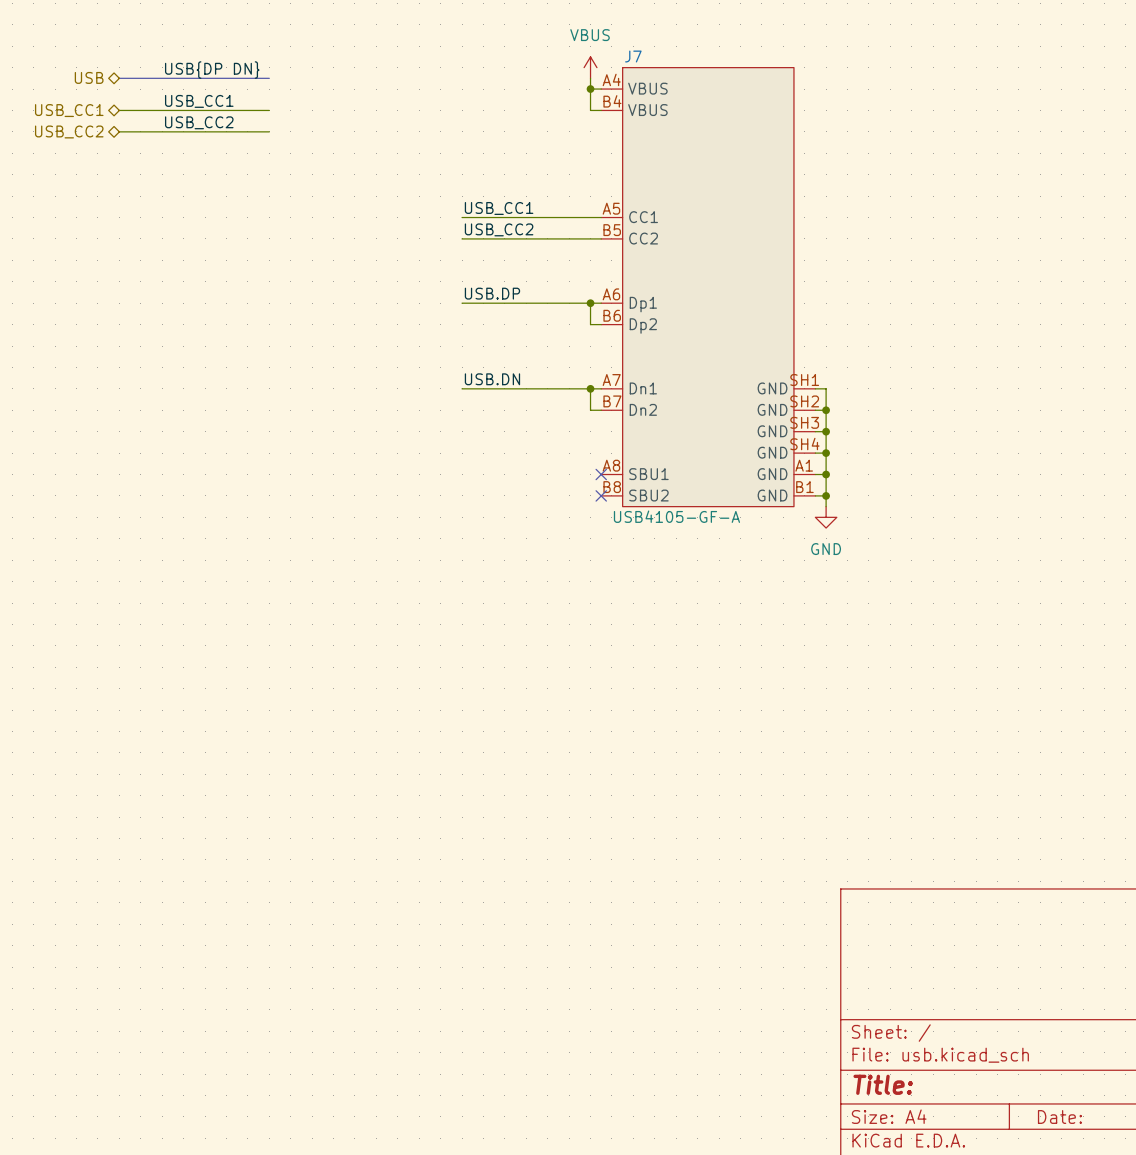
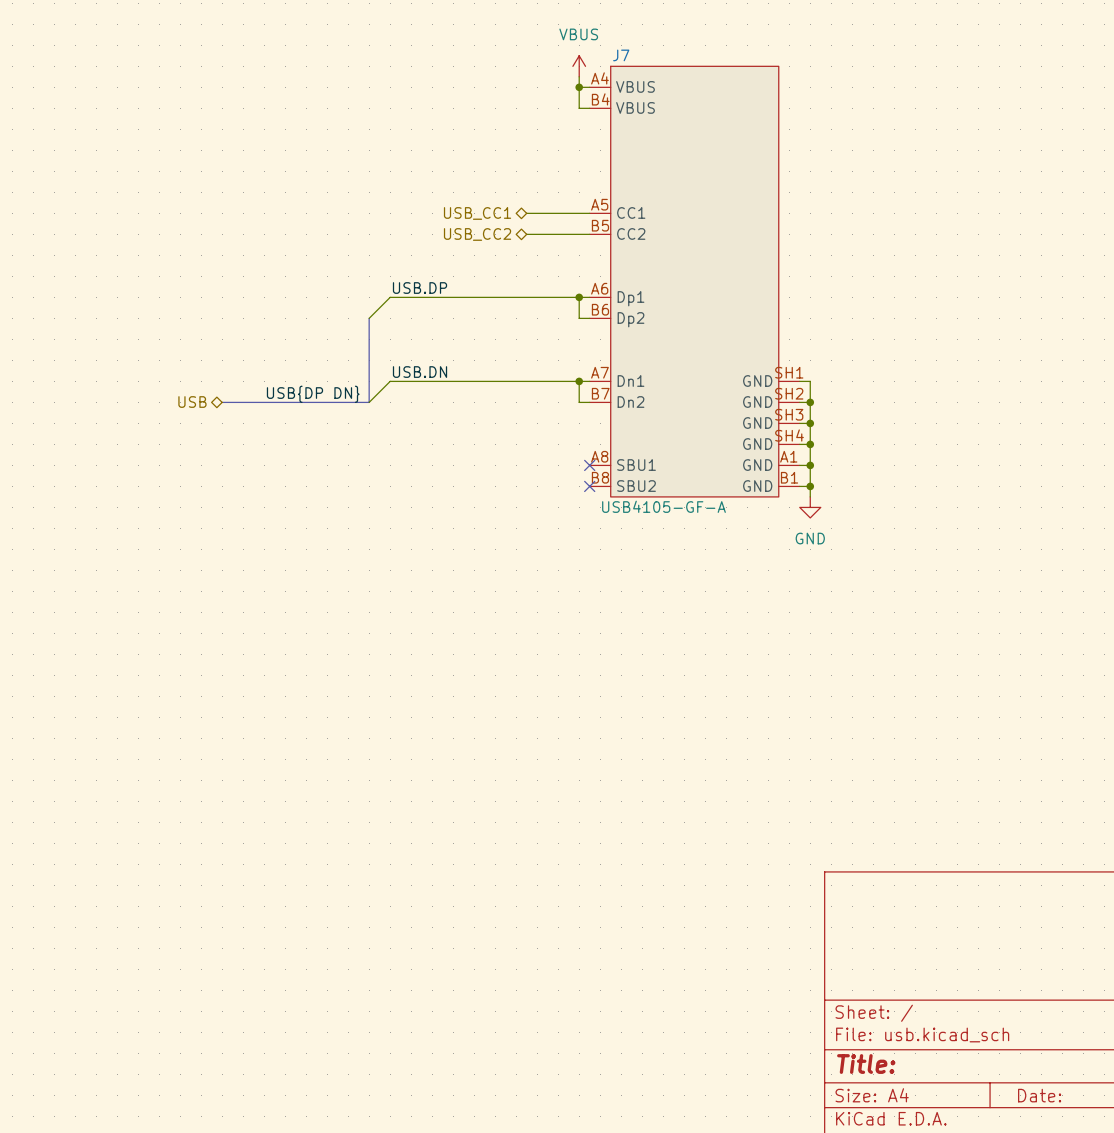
label: USB{DP DN} (212, 70) -> none
hierarchical label: USB (89, 77) -> none
bus: (119, 78) (269, 78) -> none
label: USB_CC1 (199, 101) -> none
hierarchical label: USB_CC1 (69, 110) -> none
wire: (119, 110) (269, 110) -> none
label: USB_CC2 (199, 122) -> none
hierarchical label: USB_CC2 (69, 131) -> none
wire: (119, 131) (269, 131) -> none
label: USB_CC1 (499, 208) -> none
wire: (462, 217) (536, 217) -> none
hierarchical label: none -> USB_CC1 (477, 213)
label: USB_CC2 (499, 229) -> none
wire: (462, 238) (536, 238) -> none
hierarchical label: none -> USB_CC2 (477, 234)
label position: USB.DP (492, 293) -> USB.DP (420, 288)
wire: none -> (453, 297) (390, 297) (369, 318)
bus: none -> (369, 318) (369, 402) (222, 402)
label position: USB.DN (492, 379) -> USB.DN (420, 372)
wire: none -> (453, 381) (390, 381) (369, 402)
label: none -> USB{DP DN} (313, 394)
hierarchical label: none -> USB (192, 402)

